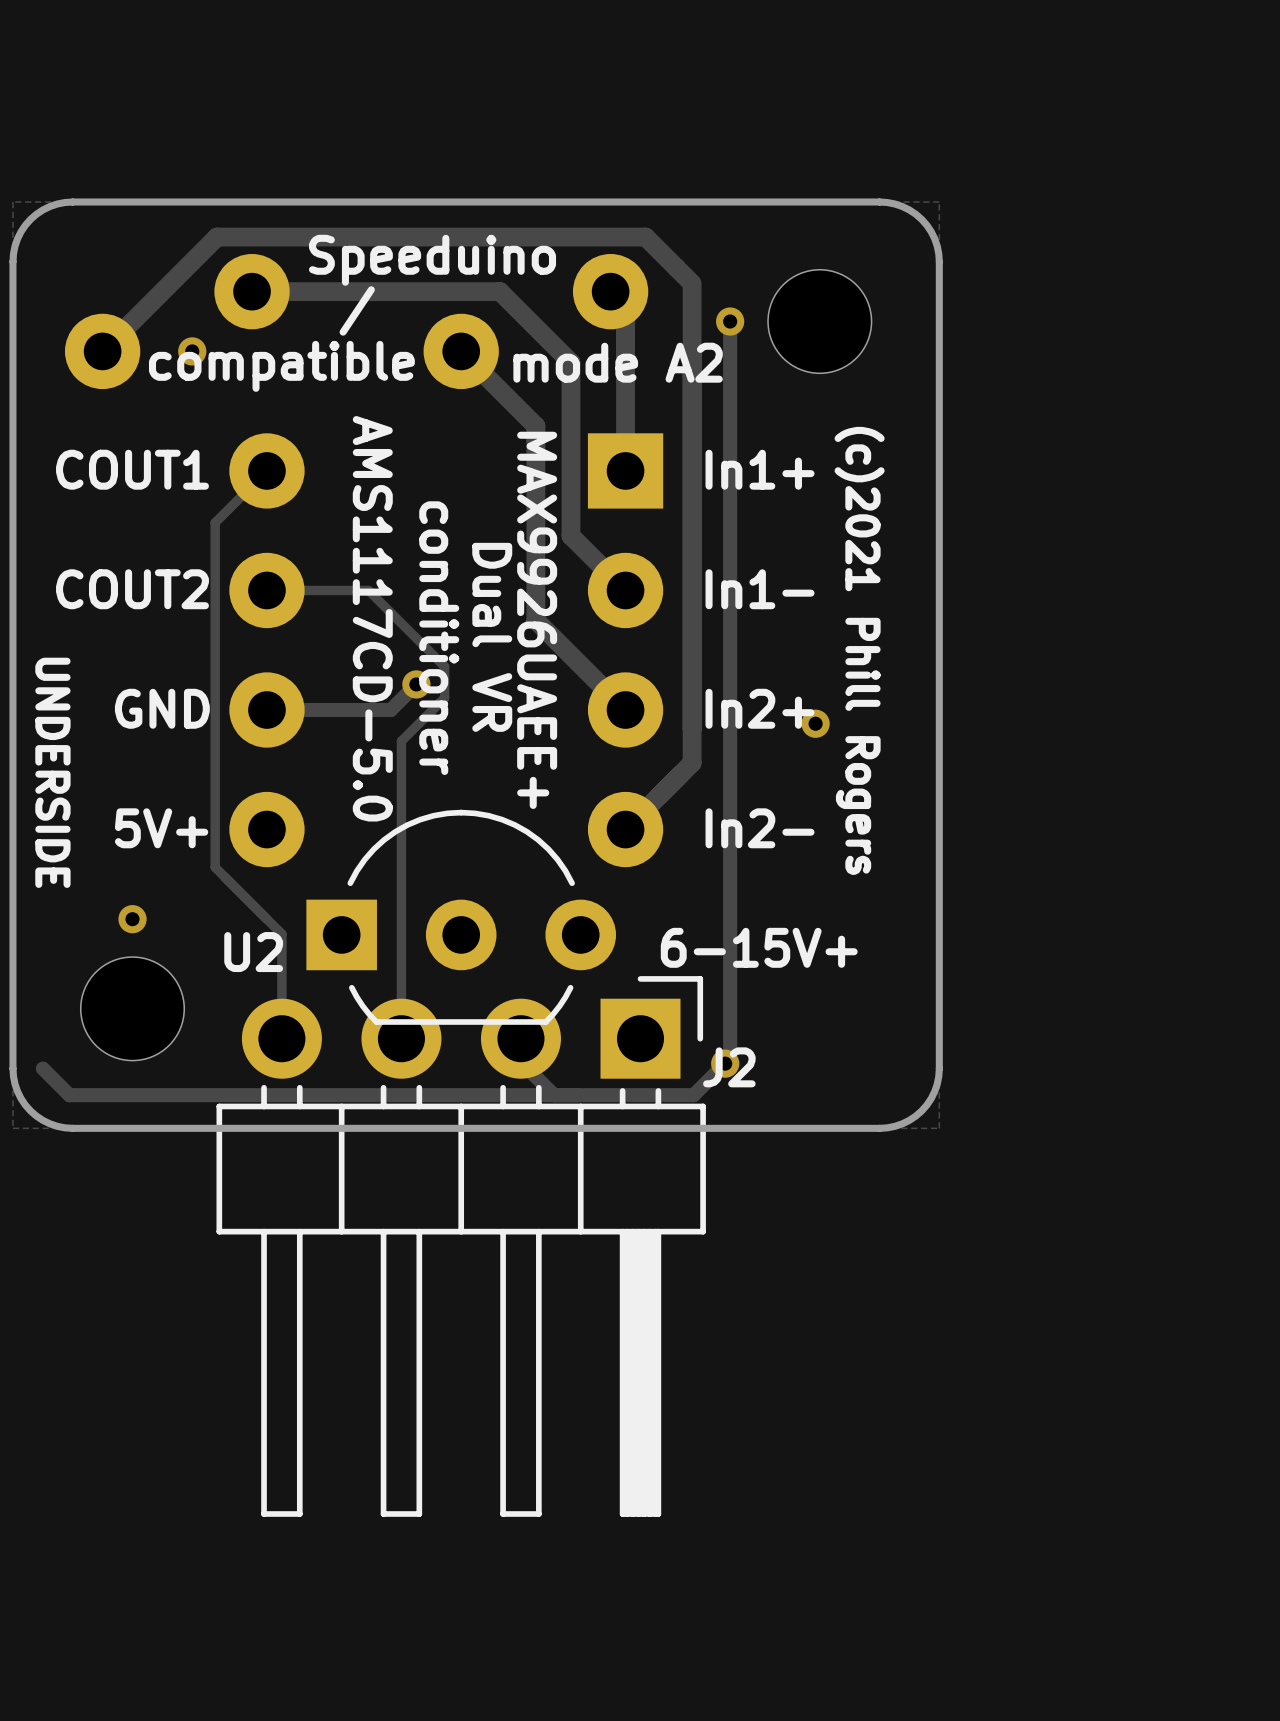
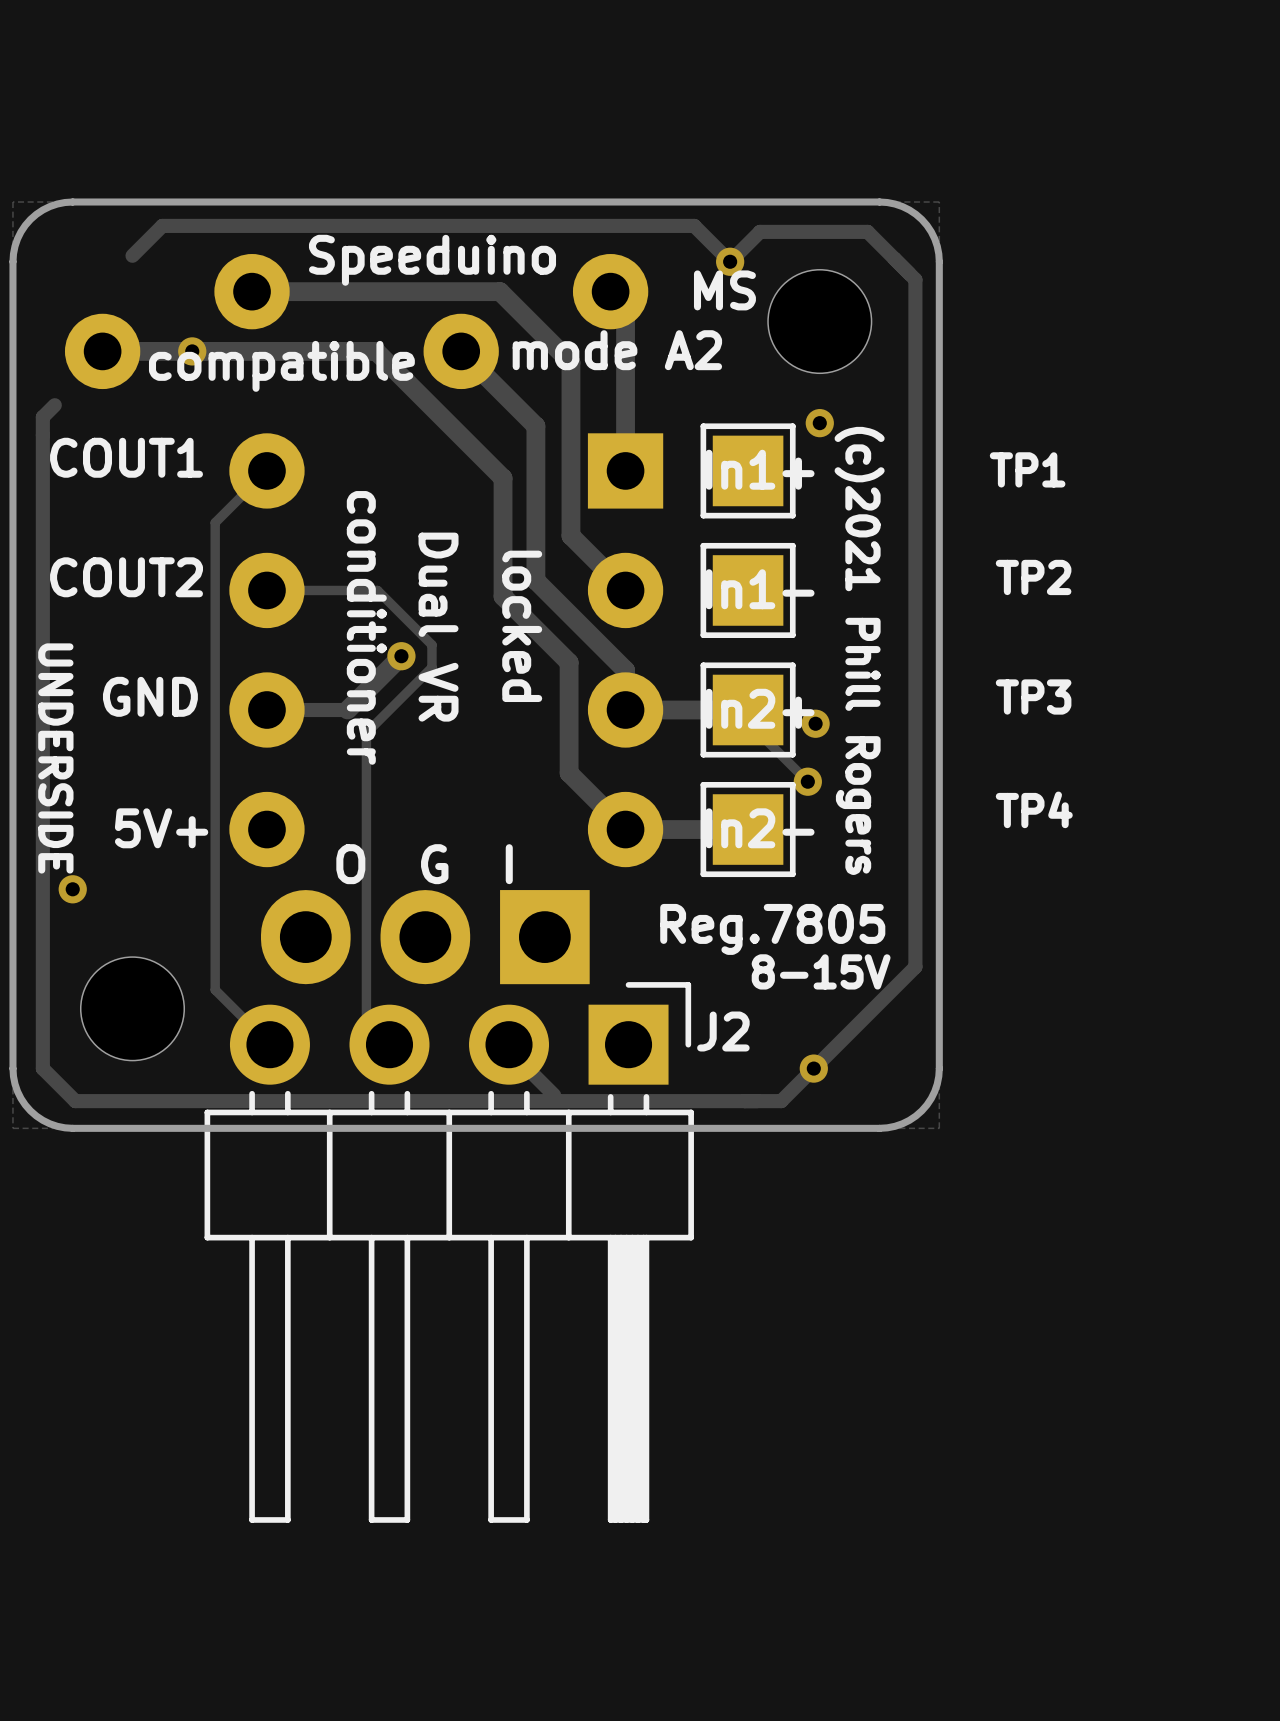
track: (692, 283) (645, 237) (216, 237) (102, 351) -> (748, 829) (625, 829) (569, 773) (569, 662) (503, 596) (503, 478) (376, 351) (102, 351)
track: (692, 286) (692, 762) (625, 829) -> none
text: none -> MS (724, 290)
text: / (357, 310) -> none
track: (730, 321) (730, 1058) (693, 1095) (69, 1095) -> (132, 255) (162, 225) (694, 225) (730, 261) (760, 231) (867, 231) (915, 279) (915, 966) (781, 1101) (75, 1101) (69, 1095)
via position: (730, 321) -> (730, 261)
text position: mode A2 (618, 362) -> mode A2 (617, 350)
track: none -> (54, 405) (42, 417) (42, 1068)
via: none -> (819, 423)
text position: COUT1 (132, 469) -> COUT1 (126, 457)
TP1: none -> (748, 470)
track: (535, 580) (535, 620) (625, 710) -> (535, 580) (625, 670) (625, 710) (748, 710) (748, 721) (807, 781)
text position: COUT2 (132, 589) -> COUT2 (126, 577)
track: (368, 590) (444, 666) (444, 698) (401, 741) (401, 1038) -> (368, 590) (377, 590) (431, 644) (431, 667) (366, 733) (366, 1021) (389, 1044)
TP2: none -> (748, 590)
text: AMS1117CD-5.0 (372, 618) -> none
part position: (537, 620) -> (522, 626)
part value: MAX9926UAEE+ (537, 620) -> locked (522, 626)
text position: Dual VR (492, 637) -> Dual VR (438, 627)
text position: conditioner (439, 638) -> conditioner (366, 627)
track: (416, 684) (390, 710) (347, 710) -> (401, 656) (347, 710)
via position: (416, 684) -> (401, 656)
text position: GND (162, 708) -> GND (150, 696)
TP3: none -> (748, 710)
text position: UNDERSIDE (52, 772) -> UNDERSIDE (55, 758)
via: none -> (807, 781)
TP4: none -> (748, 829)
text: none -> O G I (424, 864)
track: (215, 867) (281, 934) (281, 1038) -> (215, 867) (215, 989) (269, 1044)
U2: (461, 917) -> none
via position: (132, 919) -> (72, 889)
part: none -> (425, 937)
text: 6-15V+ (759, 947) -> Reg.7805 (772, 929)
text: none -> 8-15V (821, 971)
via position: (725, 1063) -> (813, 1068)
J2 name position: J2 (729, 1067) -> J2 (723, 1031)
J2 position: (461, 1246) -> (449, 1252)

